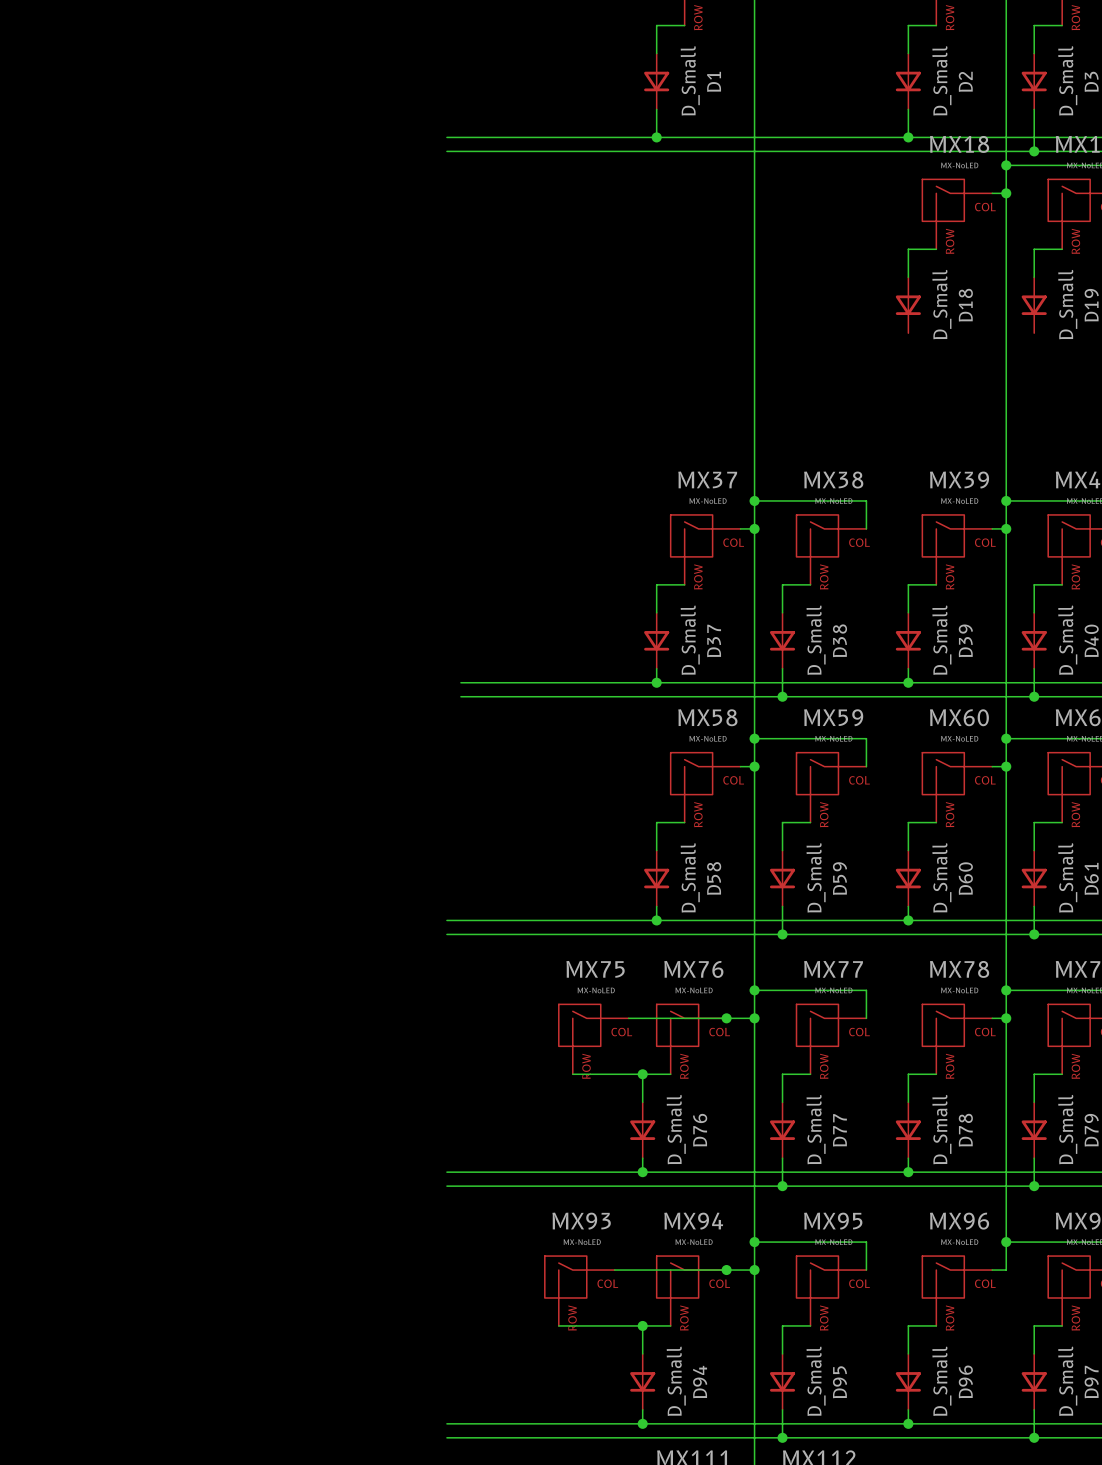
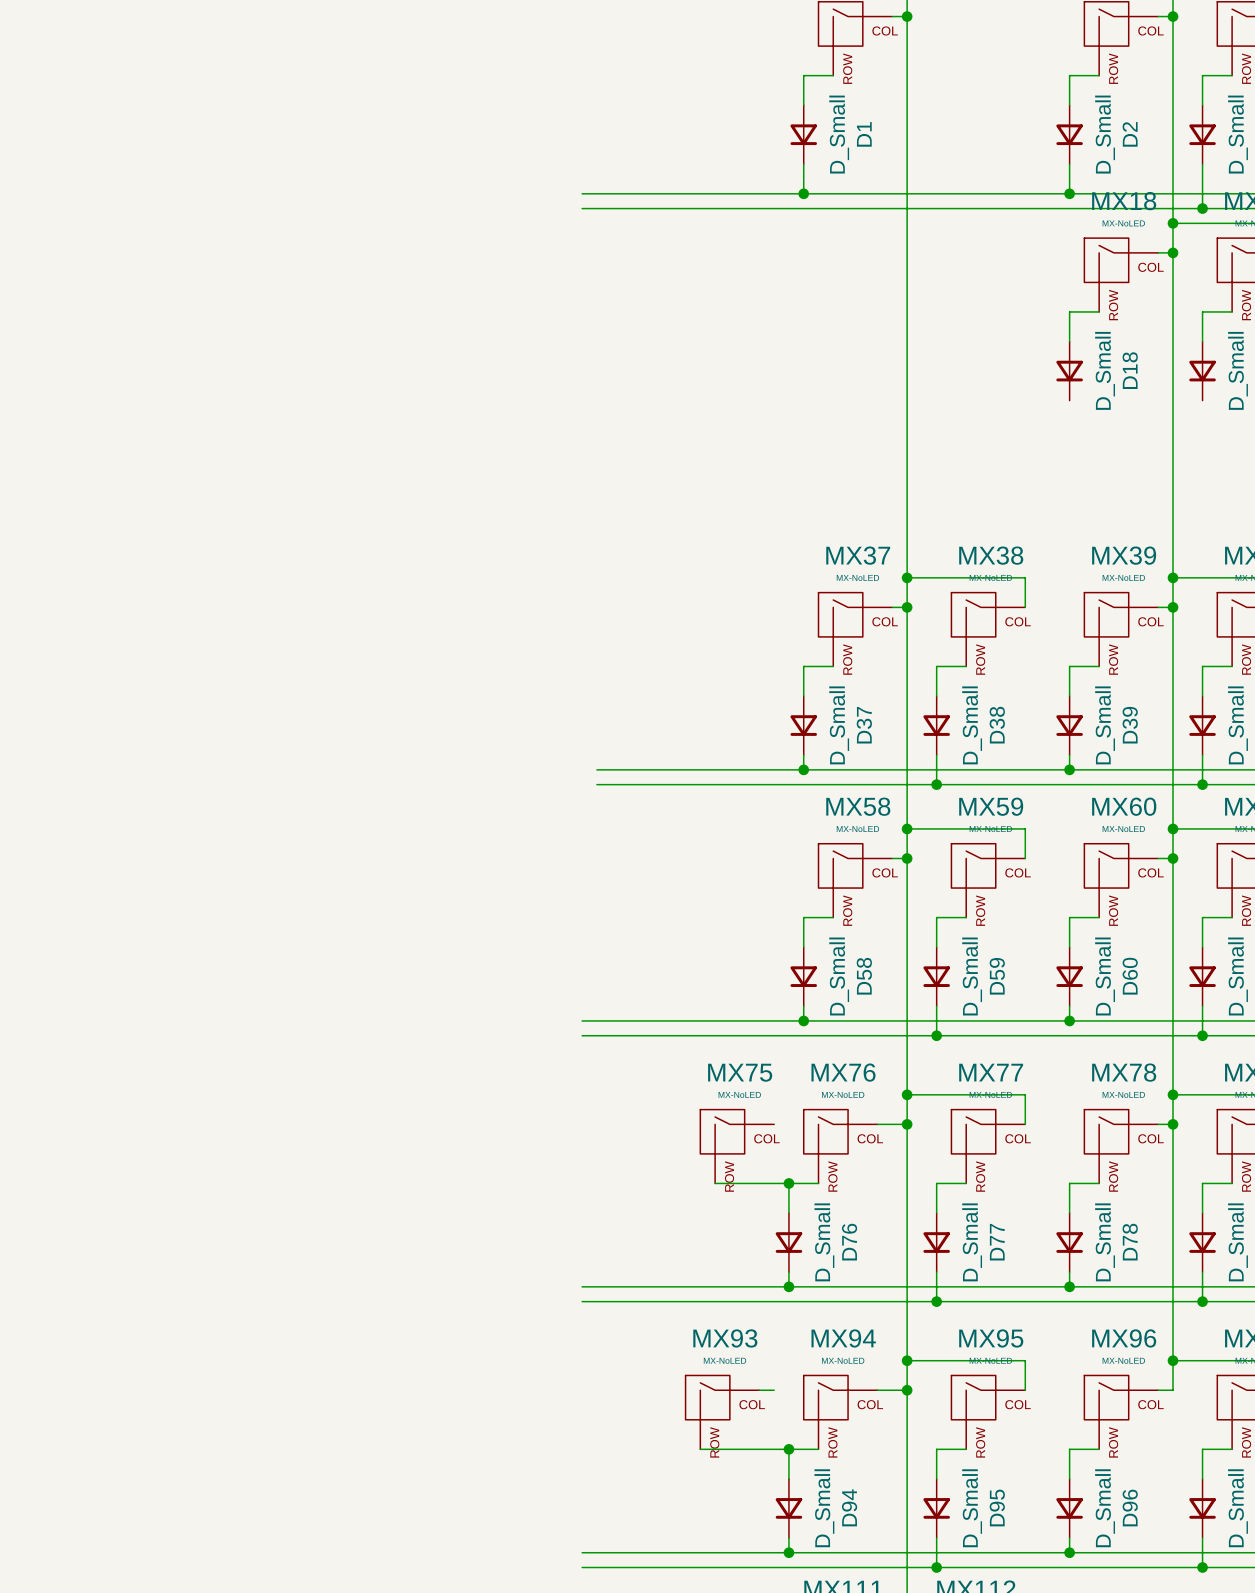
wire: (628, 1018) (726, 1018) -> none
junction: (726, 1018) -> none
wire: (628, 1270) (726, 1270) -> none
junction: (726, 1270) -> none

